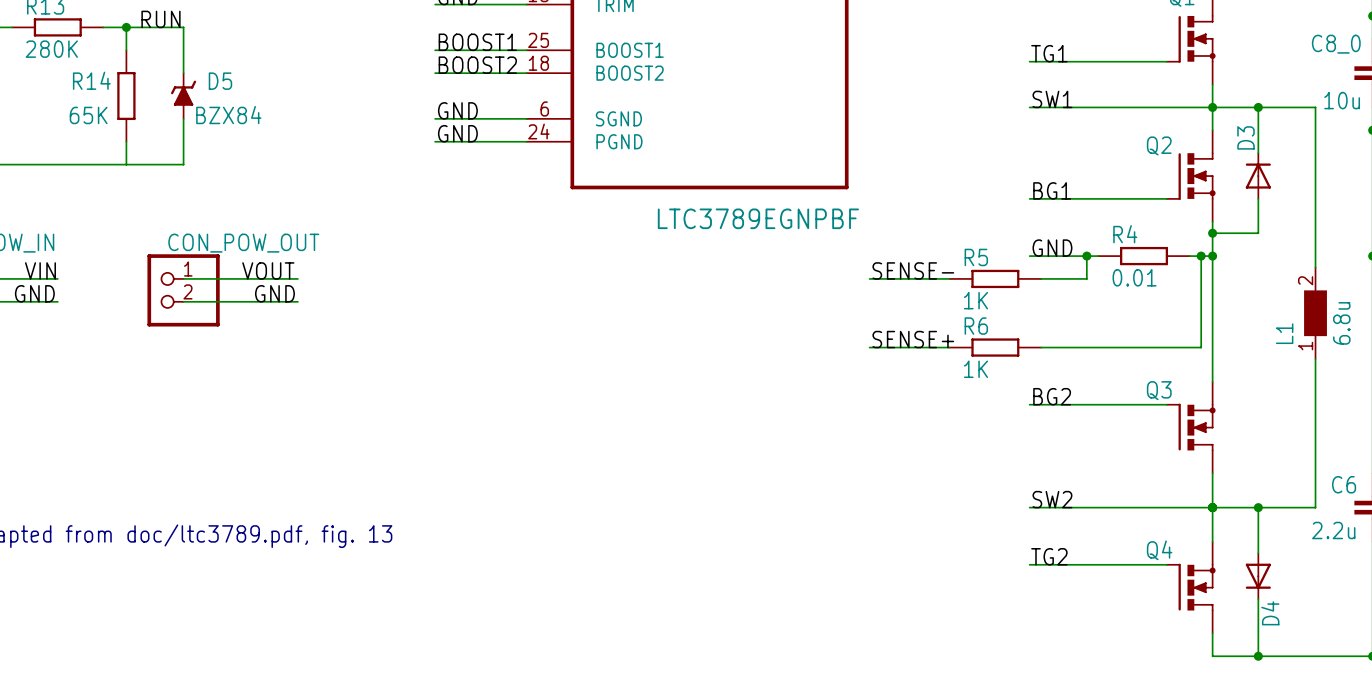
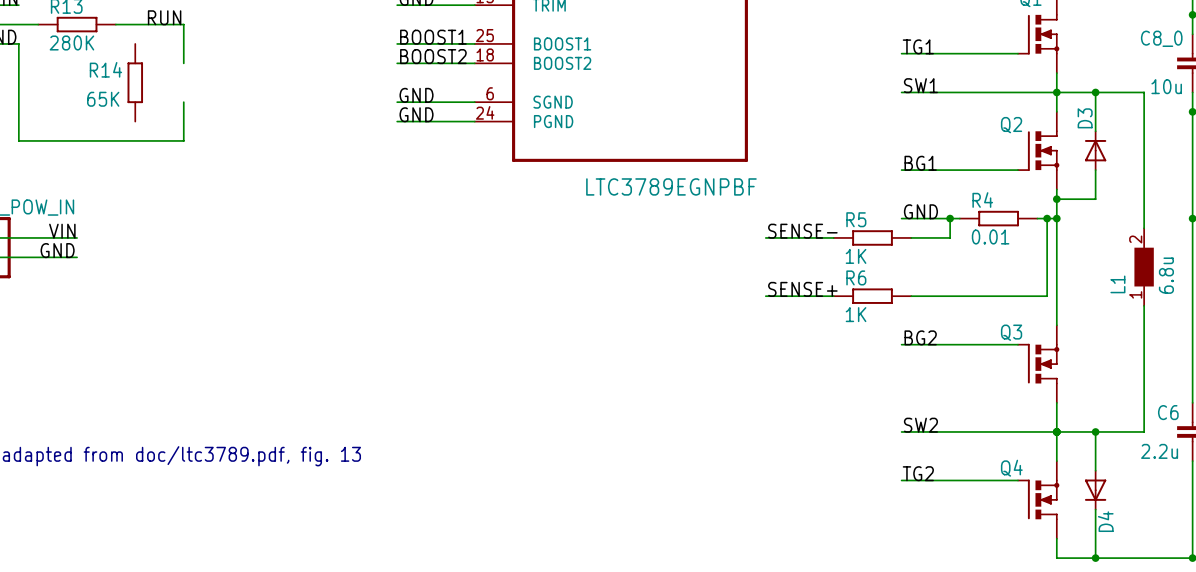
wire: (126, 27) (126, 50) -> none
junction: (126, 27) -> none
D5: BZX84 (183, 96) -> none
wire: (126, 141) (126, 164) -> none
label: VOUT (268, 270) -> none
wire: (183, 278) (297, 278) -> none
CON_POW_OUT: (183, 290) -> none
label: GND (274, 293) -> none
wire: (183, 301) (297, 301) -> none

